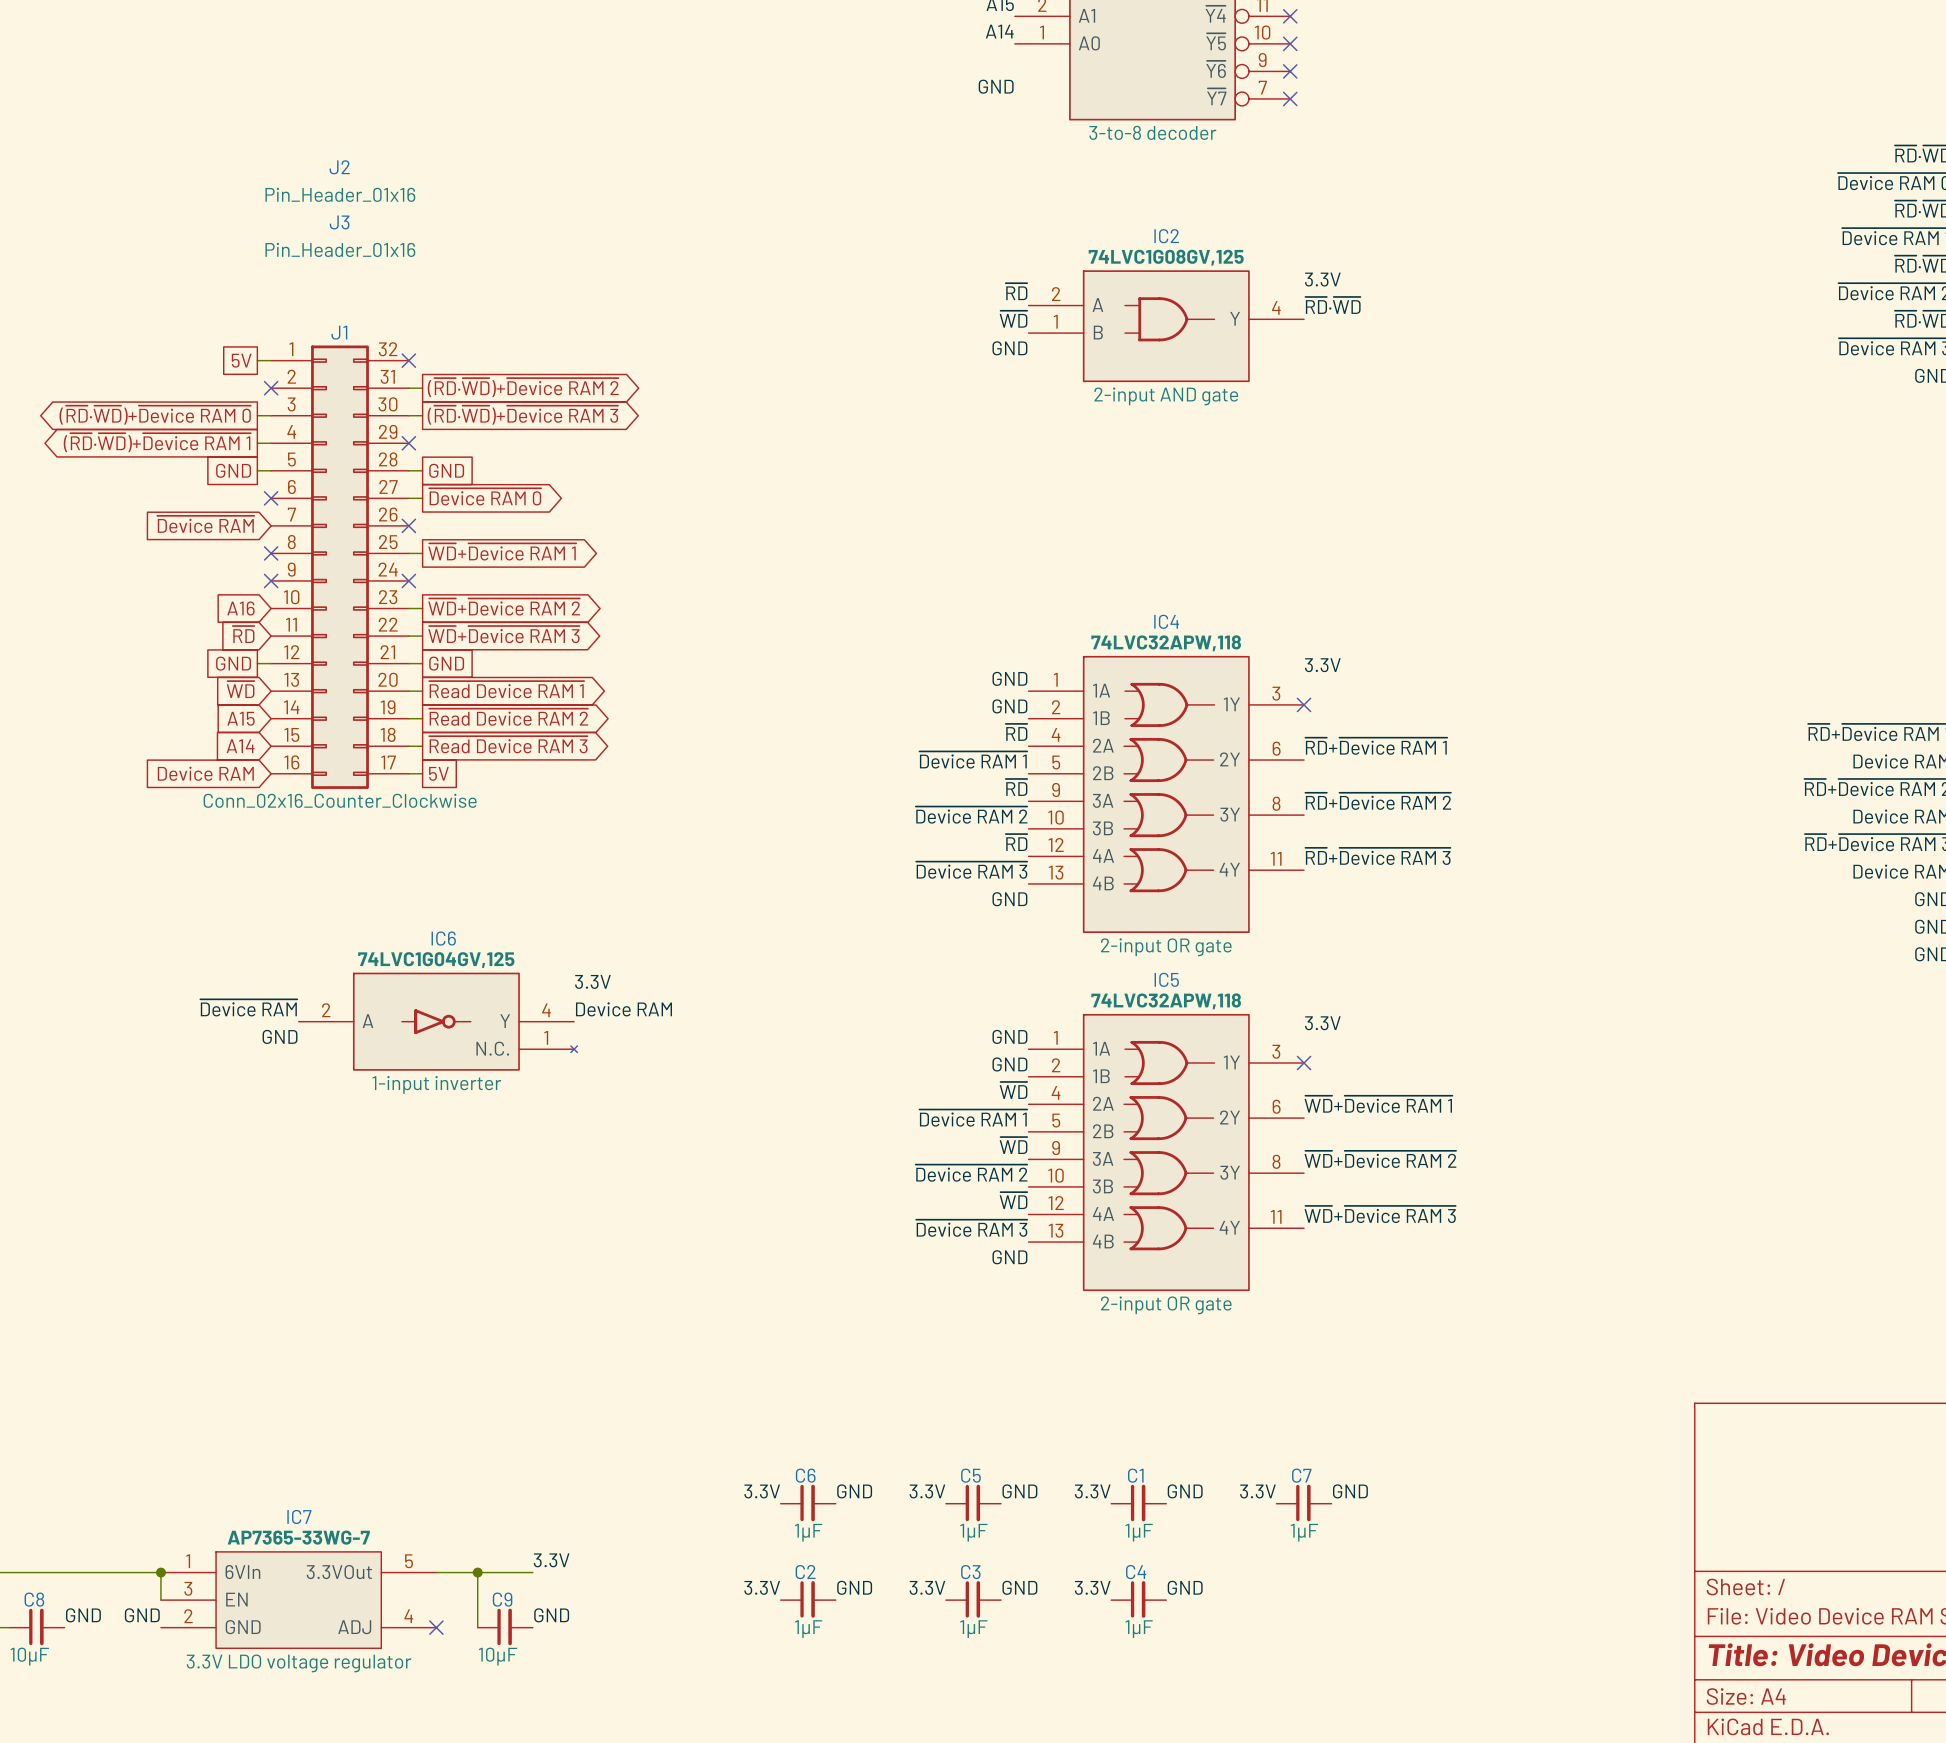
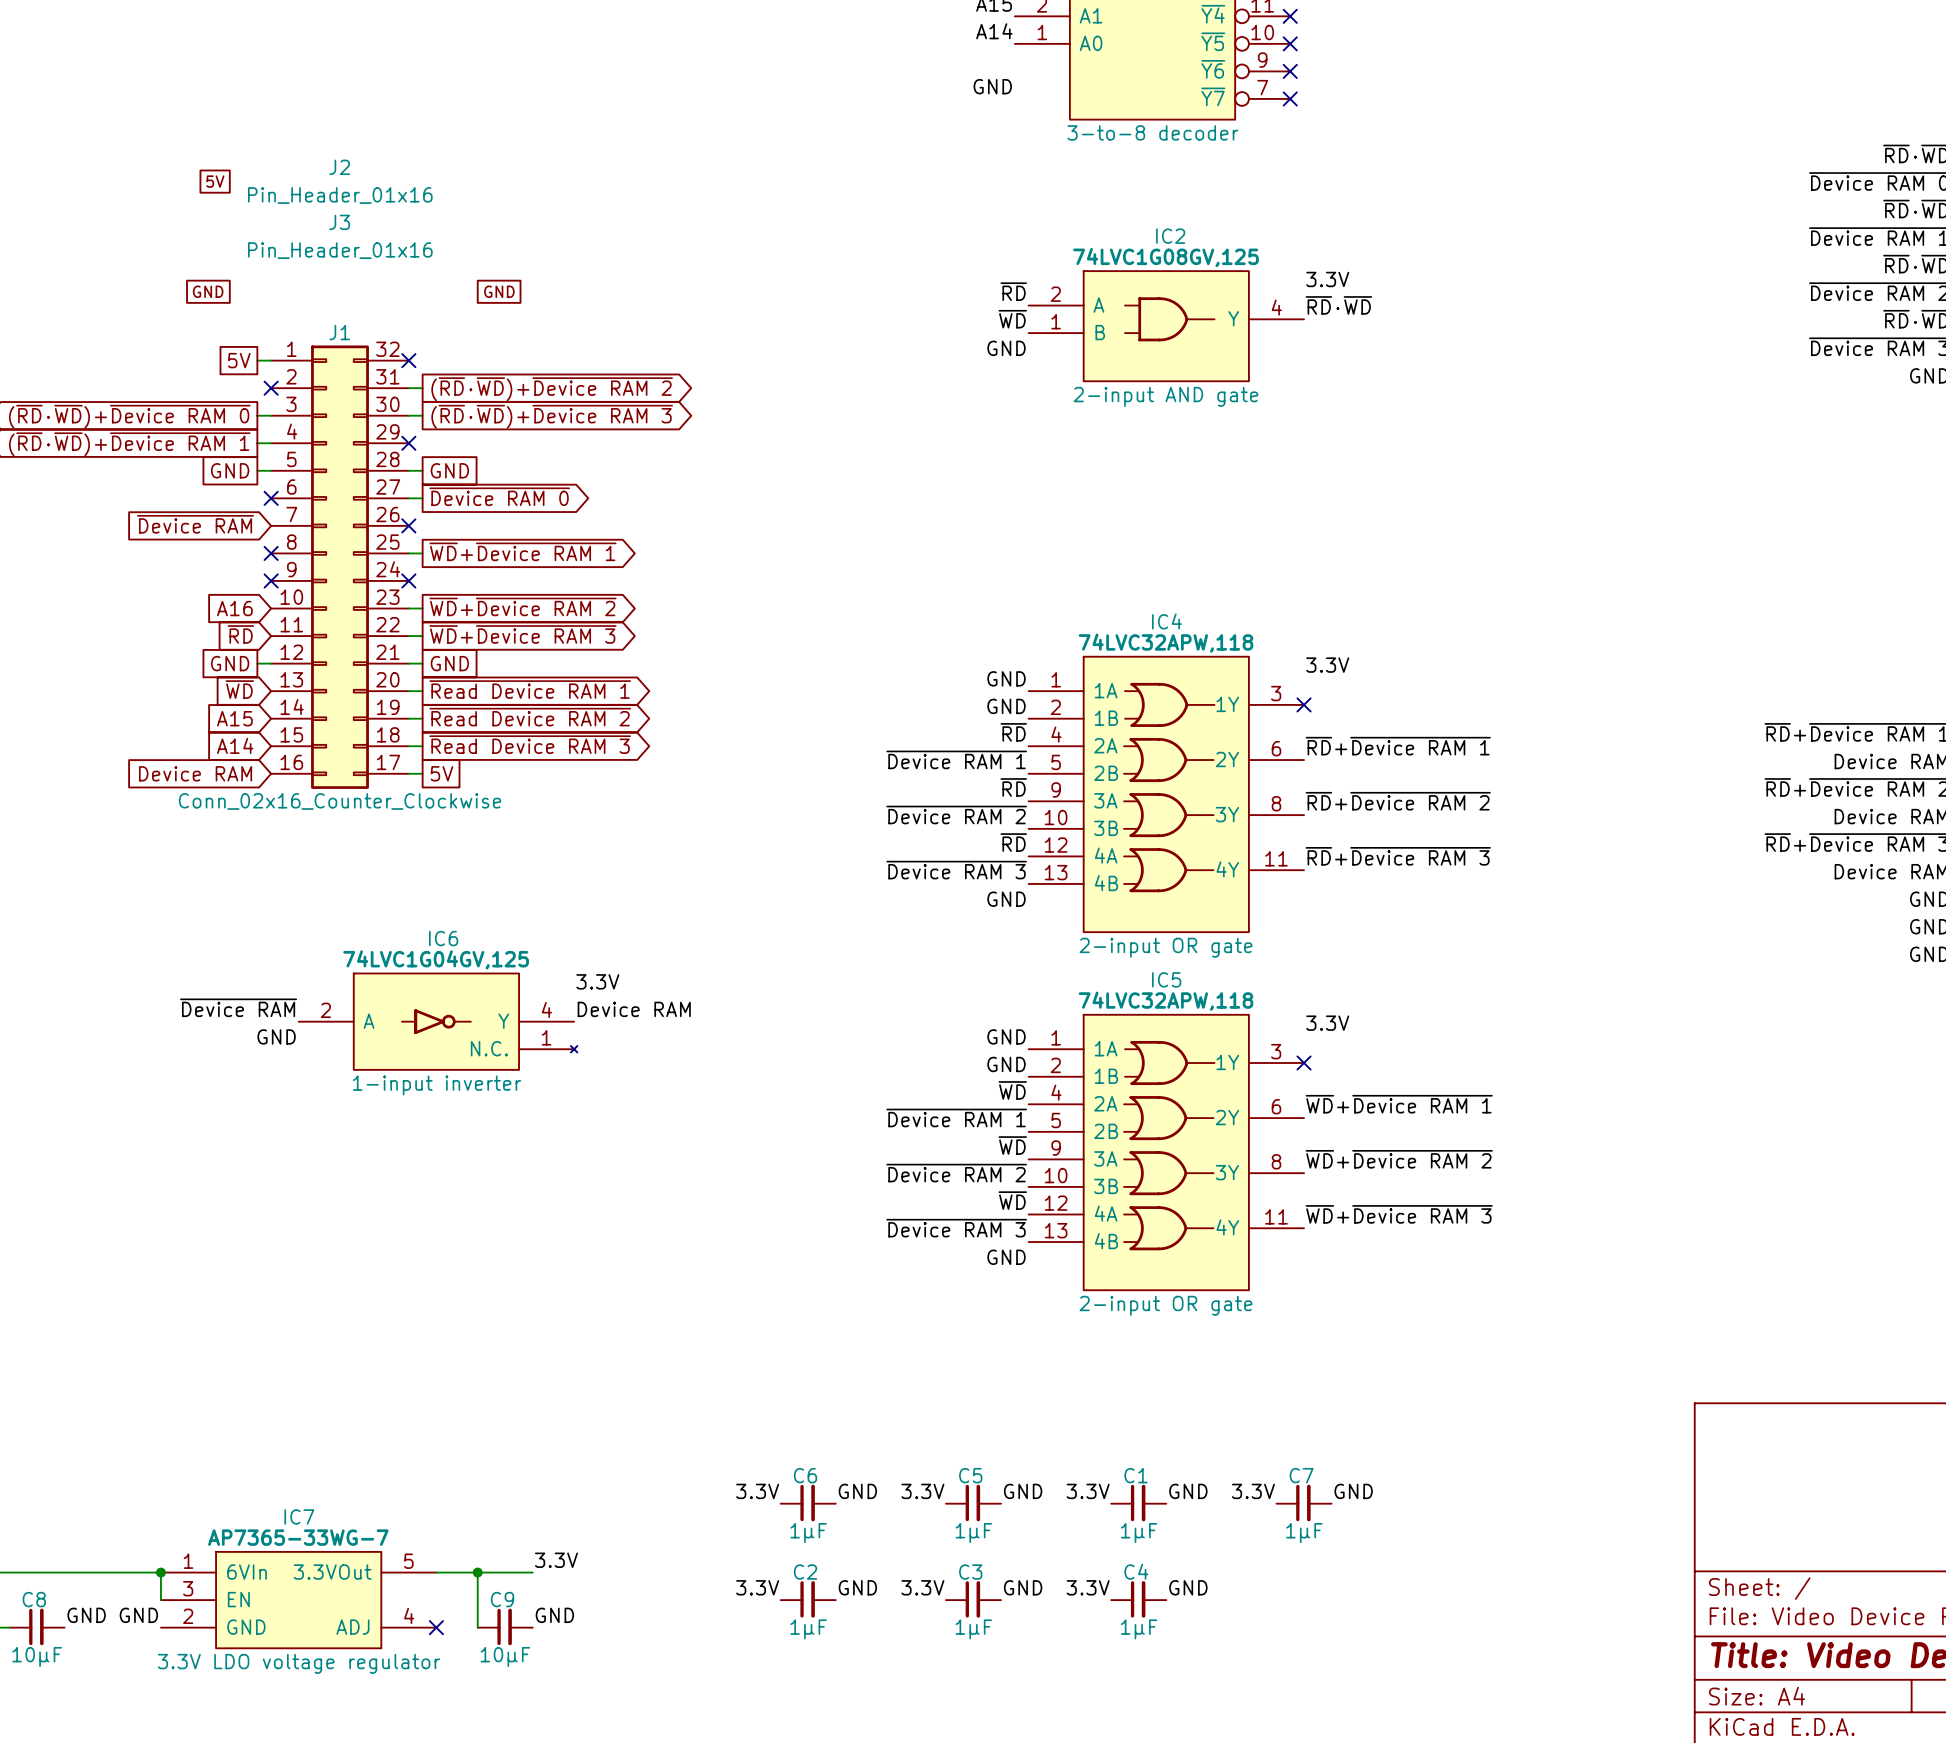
global label: none -> 5V (215, 181)
global label: none -> GND (208, 291)
global label: none -> GND (499, 291)

